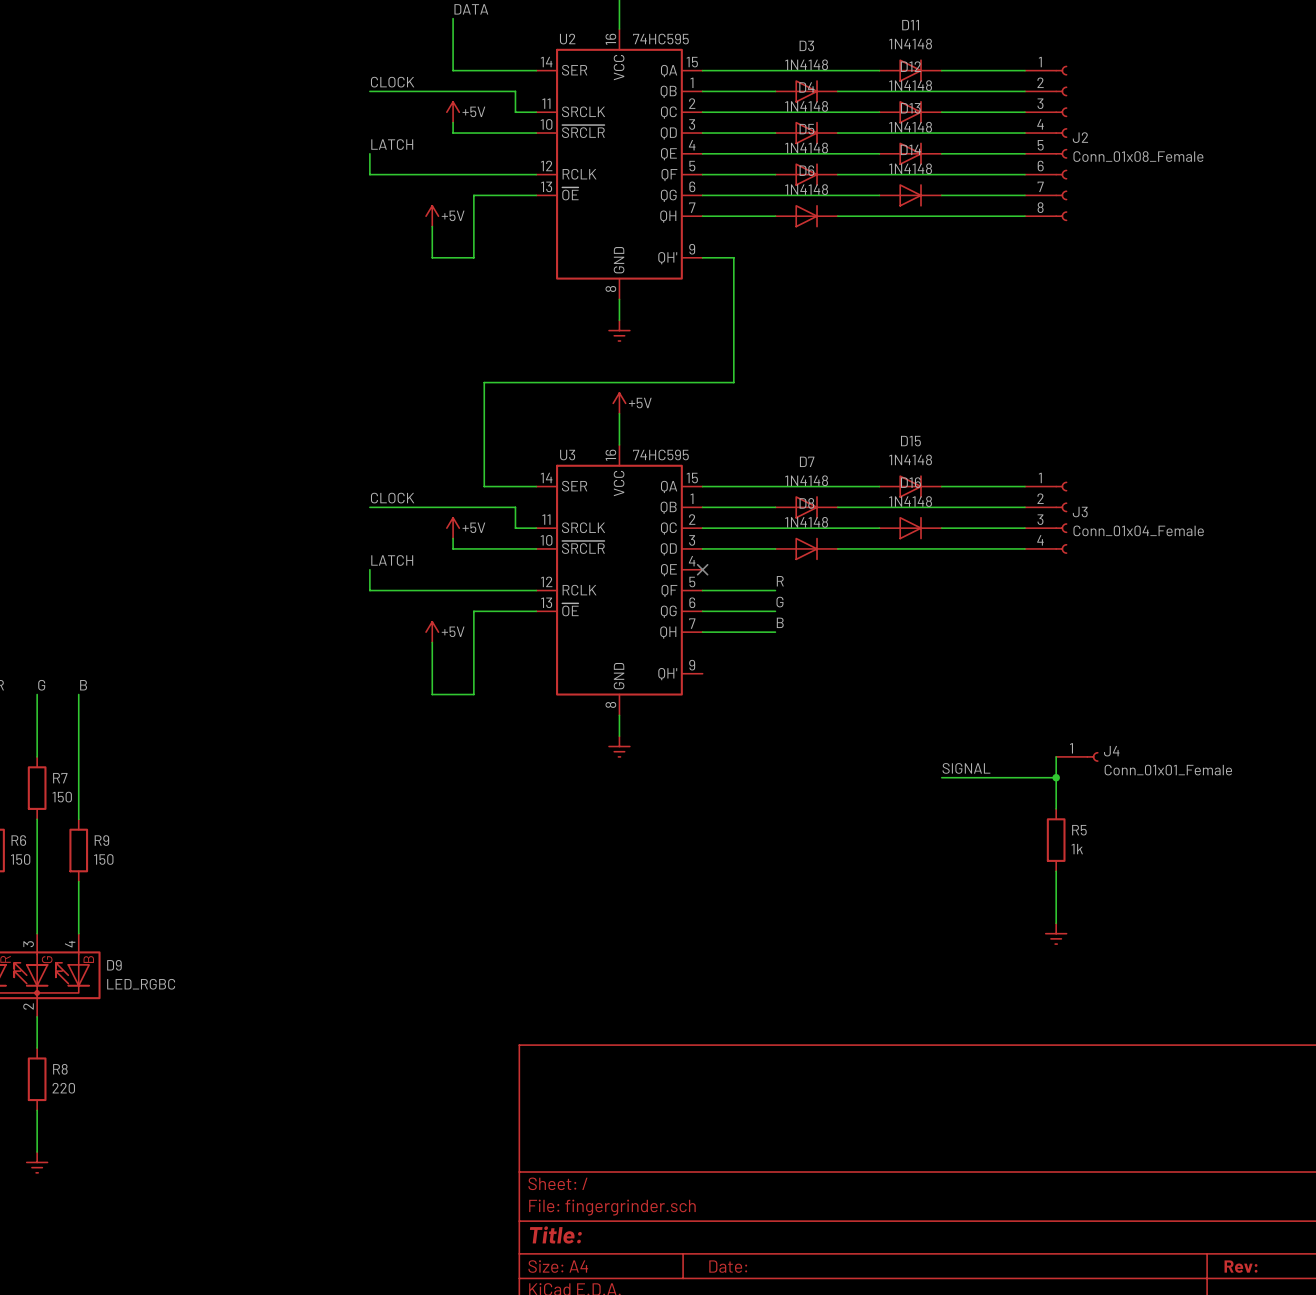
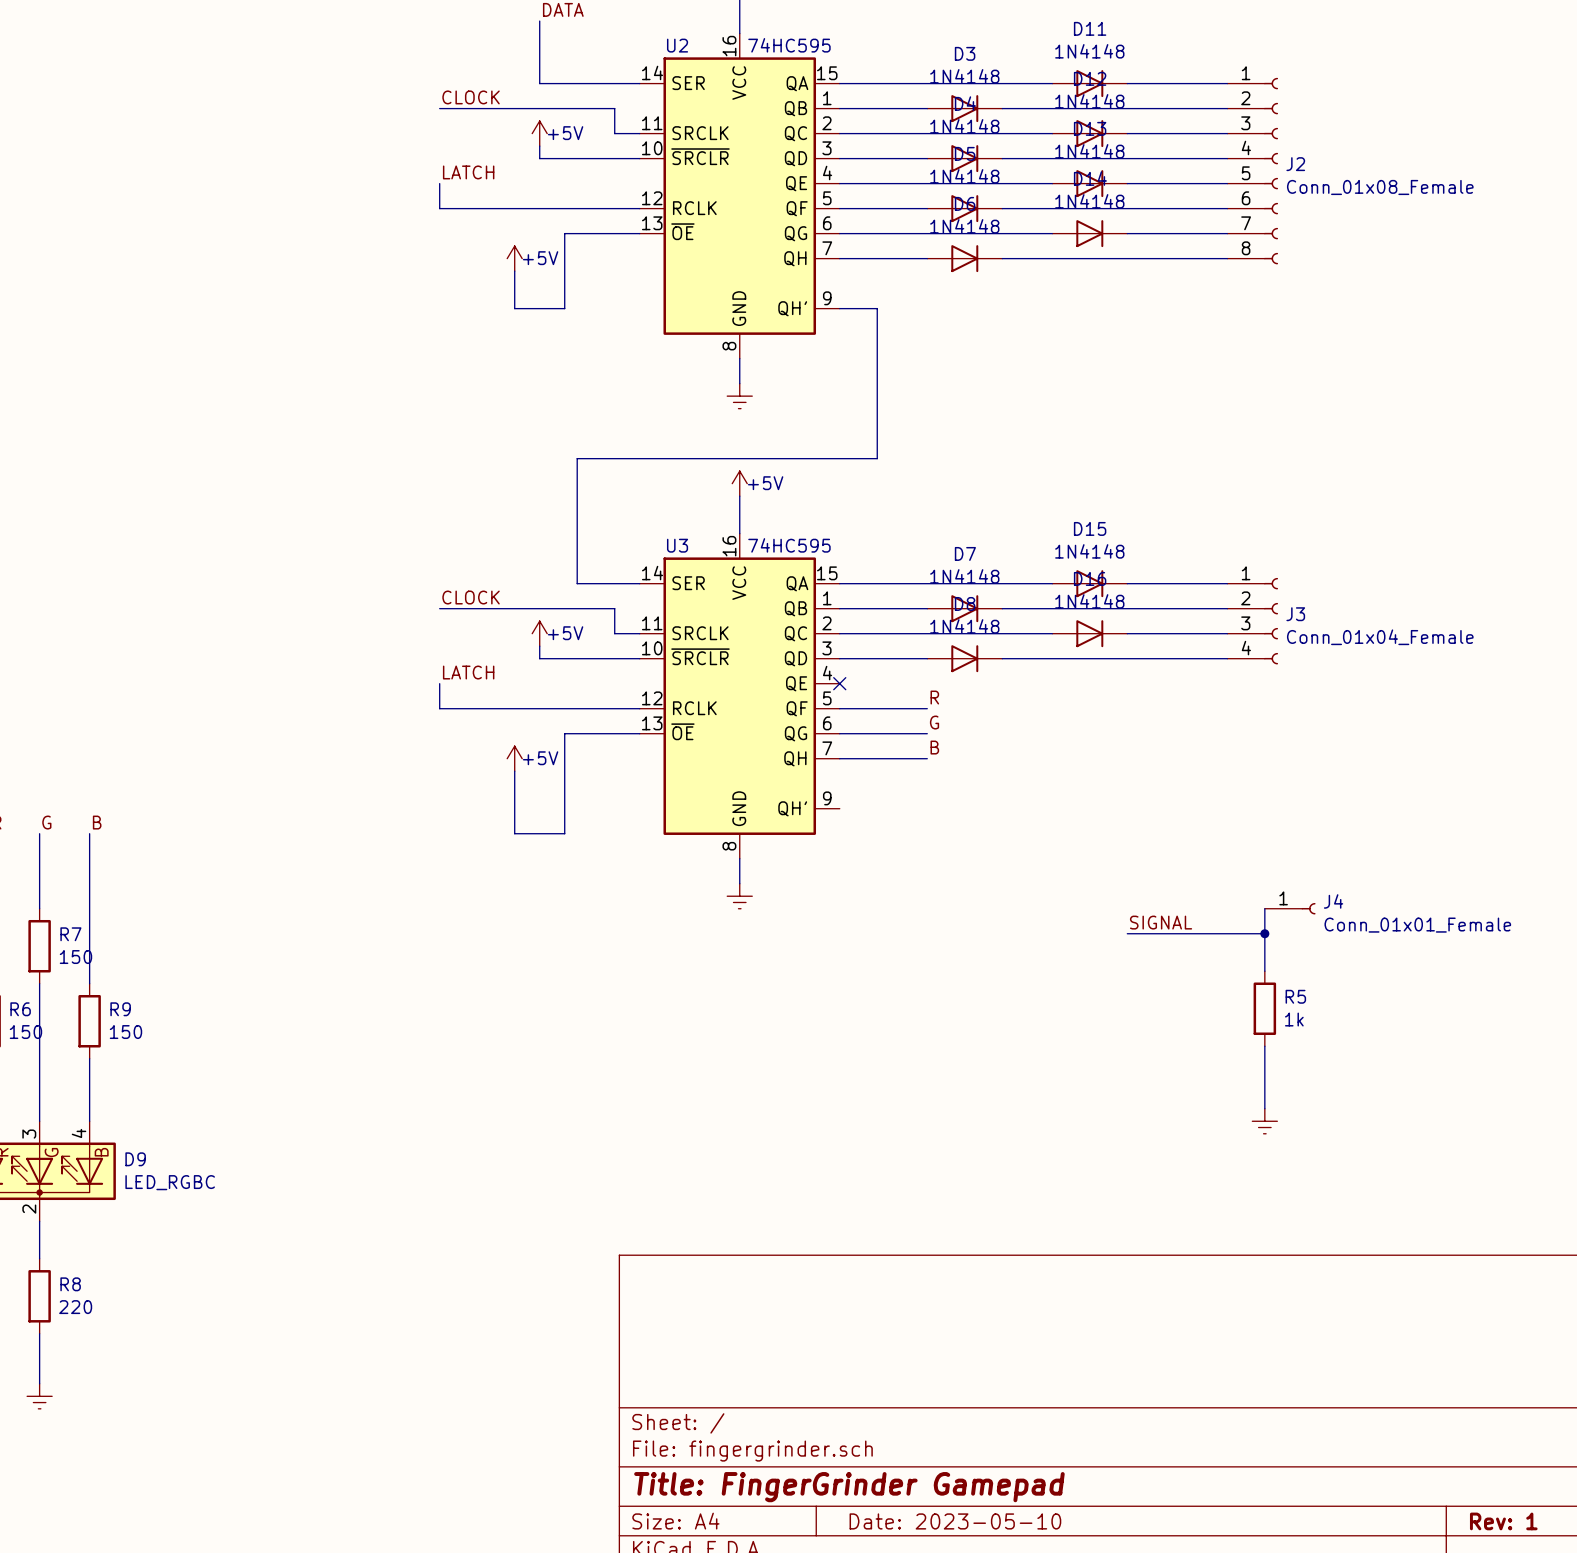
title block: Title: (555, 1234) -> Title: FingerGrinder Gamepad (849, 1487)
title block: Date: (728, 1266) -> Date: 2023-05-10 (955, 1521)
title block: Rev: (1241, 1266) -> Rev: 1 (1503, 1521)

